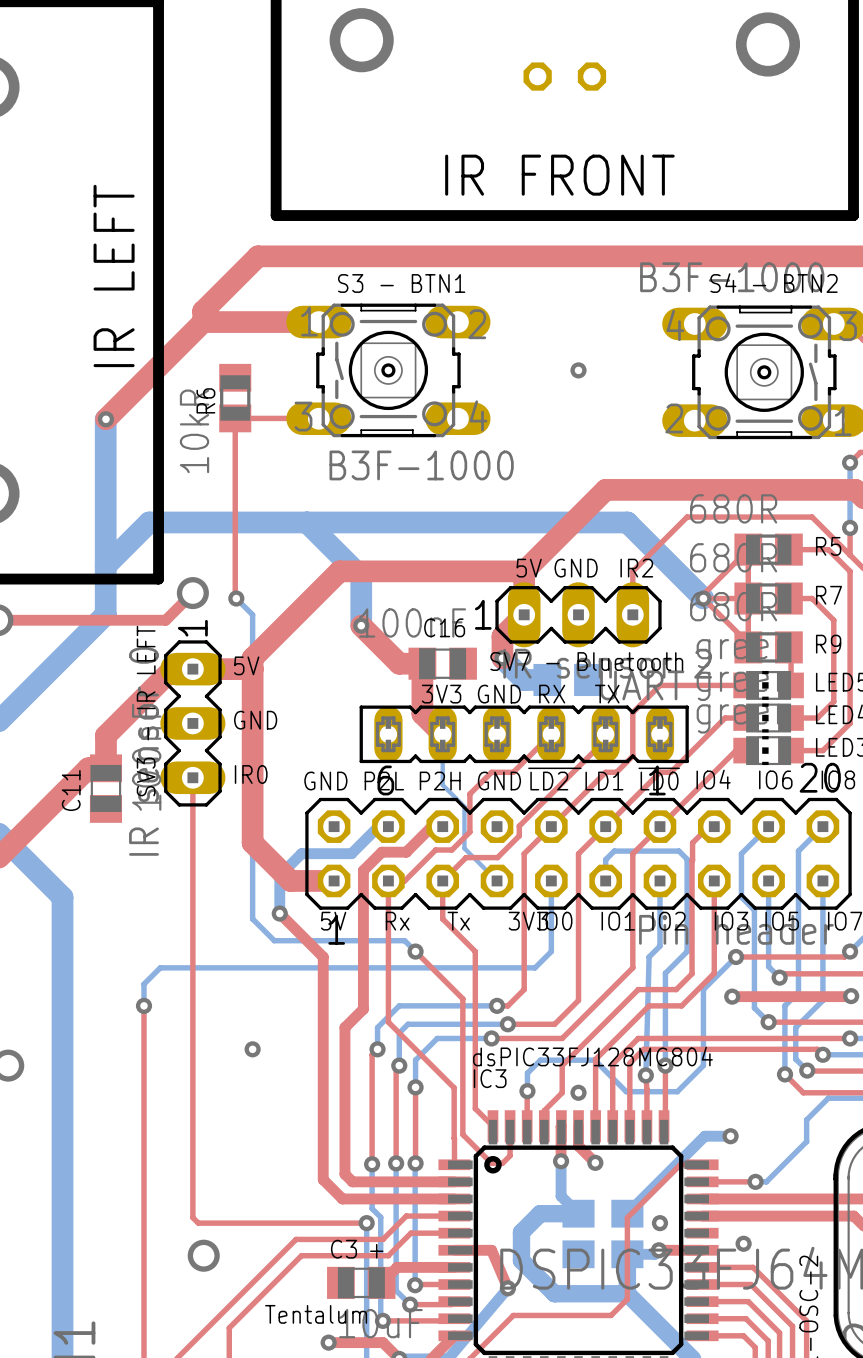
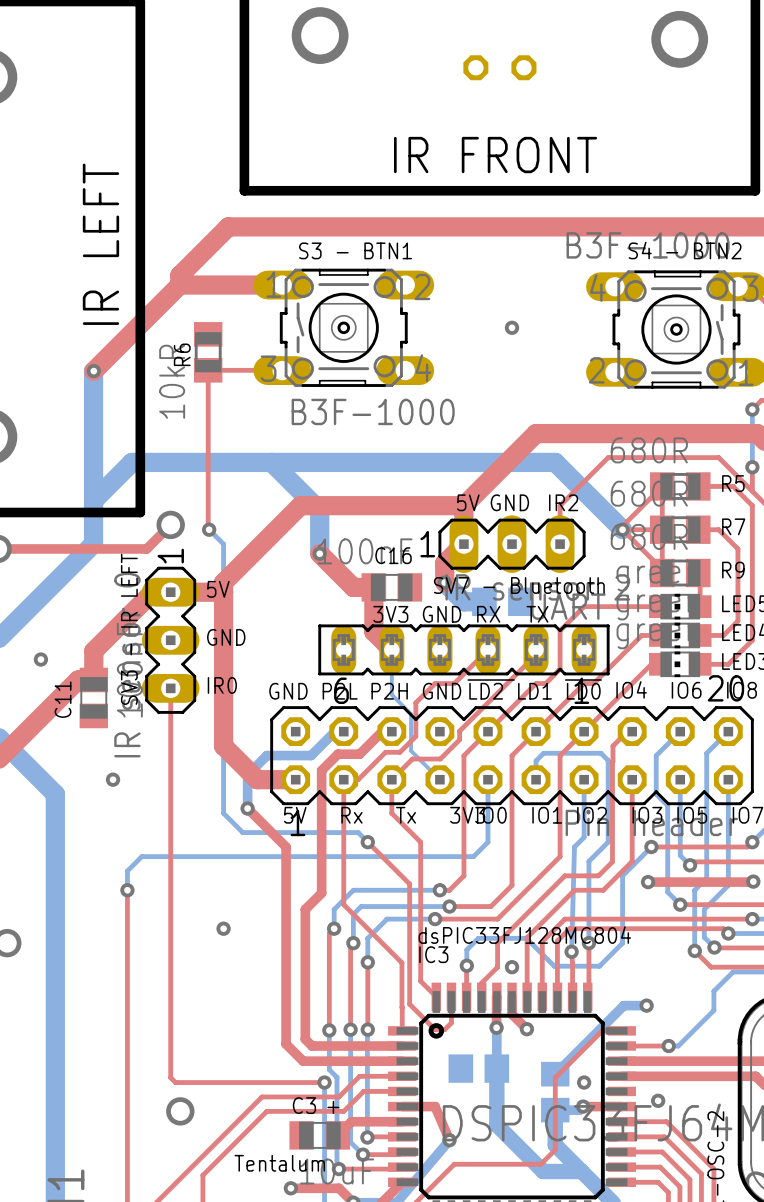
via: none -> (40, 659)
via: none -> (113, 779)
bottom track: (561, 1161) (561, 1196) (578, 1213) (540, 1213) (521, 1232) (521, 1260) (554, 1293) (627, 1293) -> (496, 1027) (496, 1125) (543, 1171) (581, 1171)
part rotation: 0° (578, 1233) -> 90° clockwise (478, 1068)
part position: (578, 1233) -> (478, 1068)

